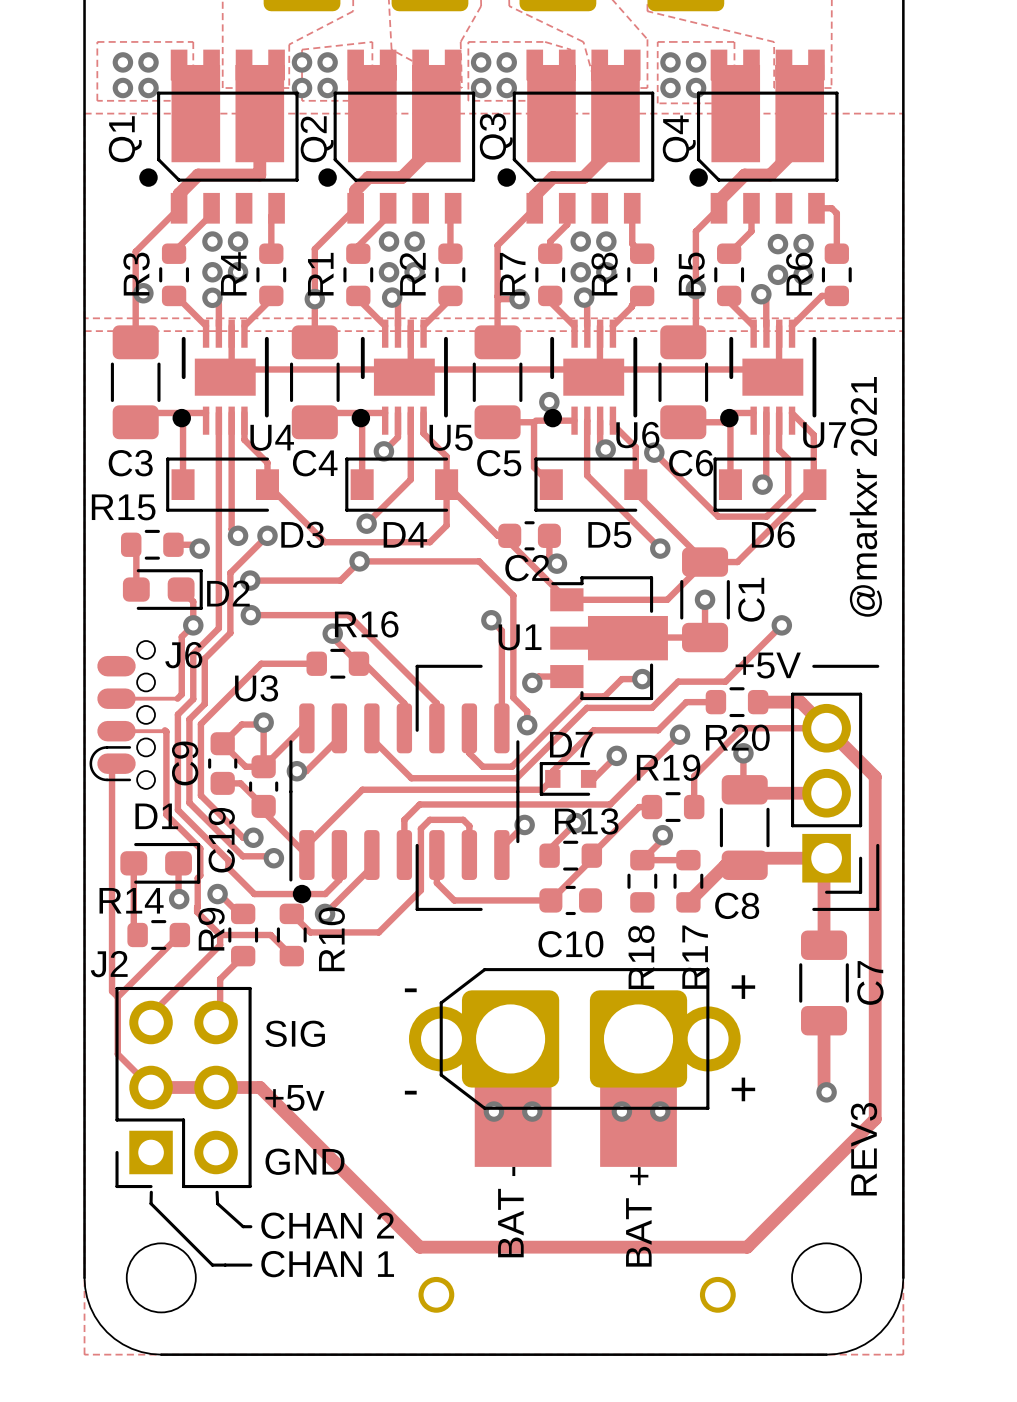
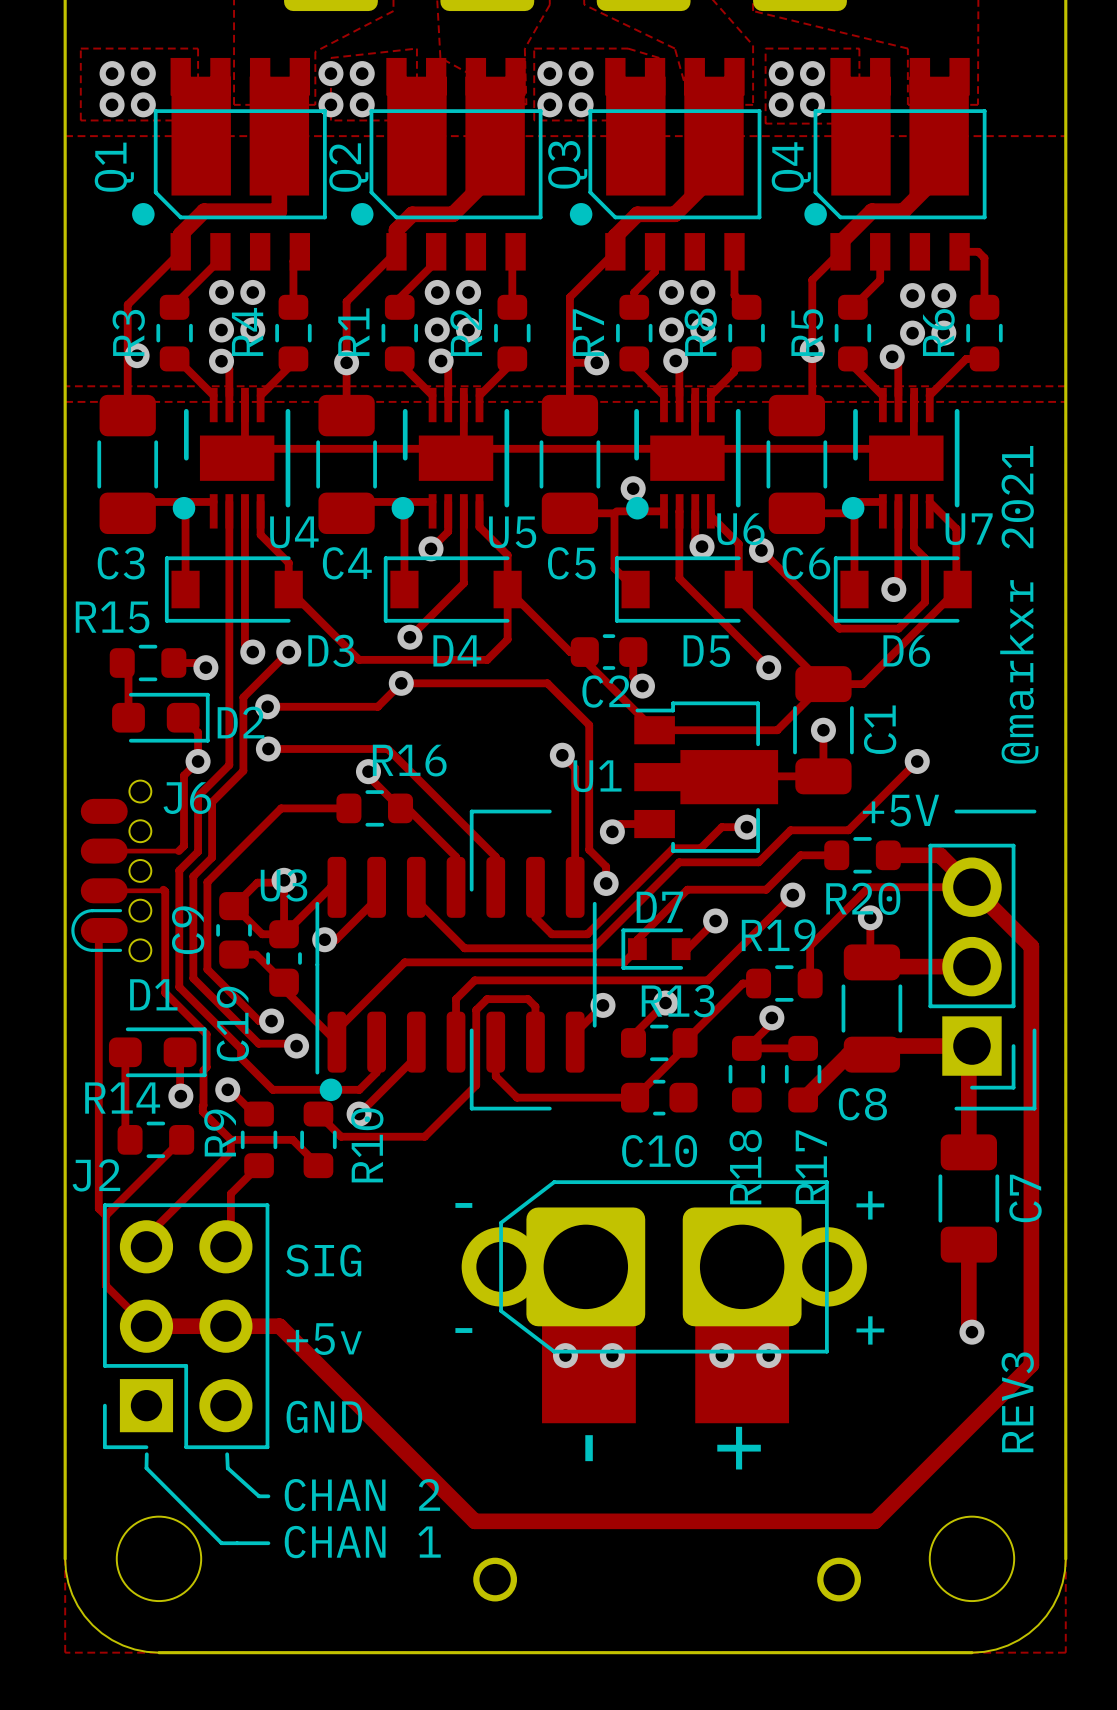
U3 name position: U3 (256, 688) -> U3 (284, 885)
text: BAT - (510, 1212) -> - (589, 1448)
text: BAT + (638, 1216) -> + (739, 1448)

